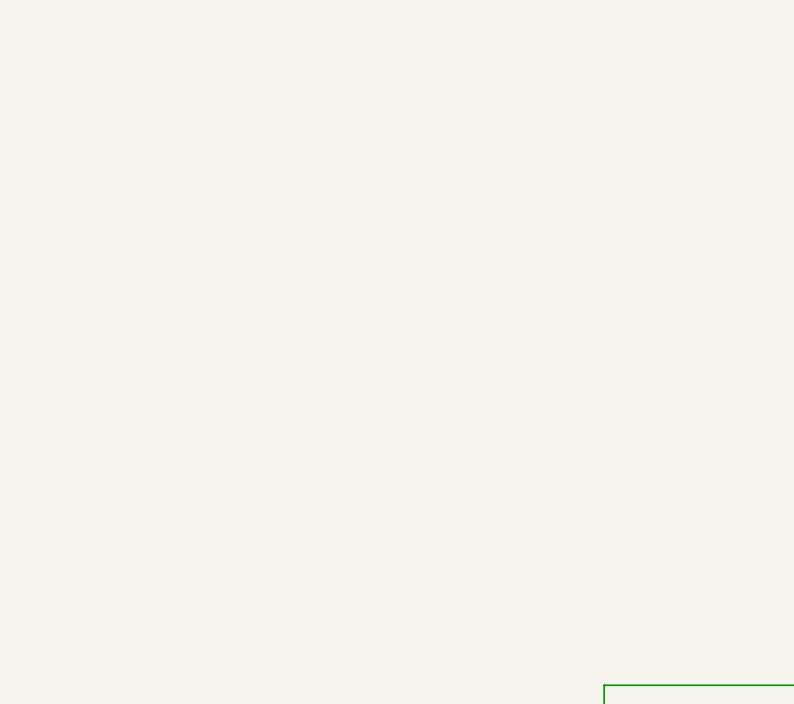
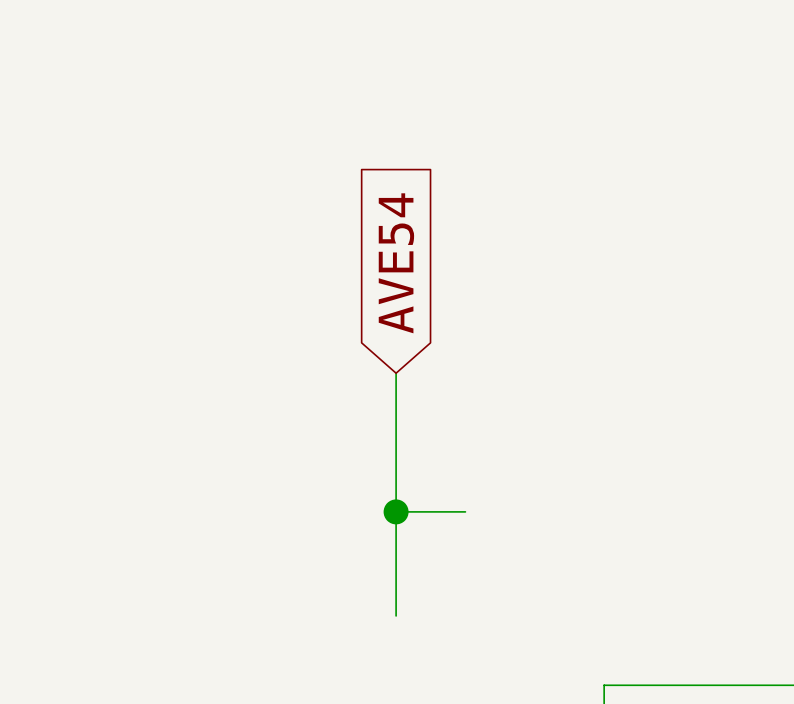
global label: none -> AVE54 (396, 263)
wire: none -> (396, 373) (396, 615)
wire: none -> (396, 511) (465, 511)
junction: none -> (396, 511)

